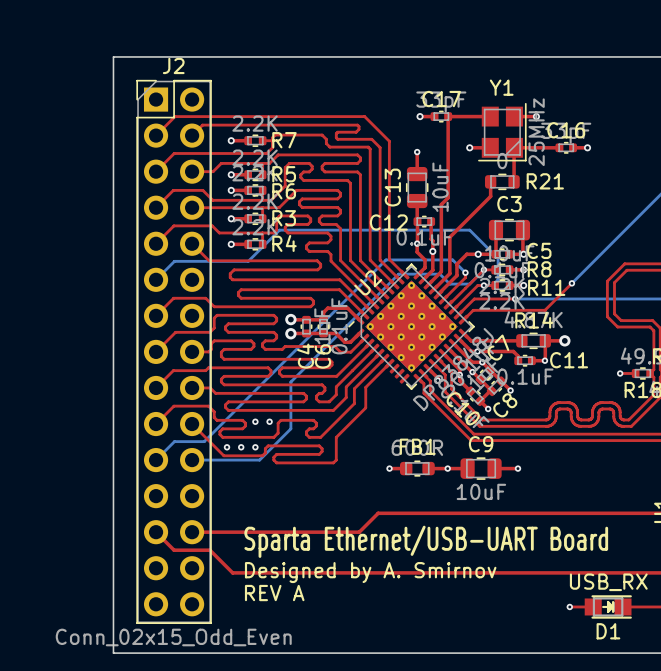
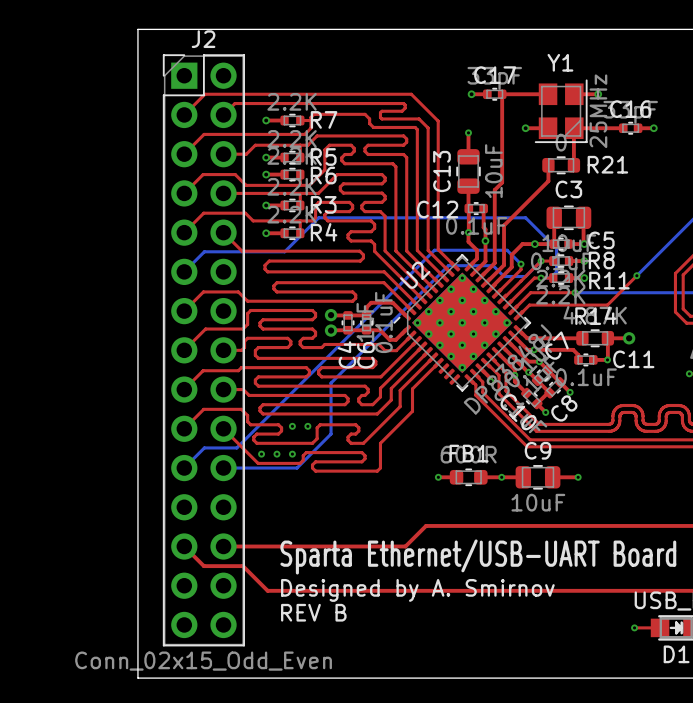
text: REV A (274, 593) -> REV B (313, 612)

